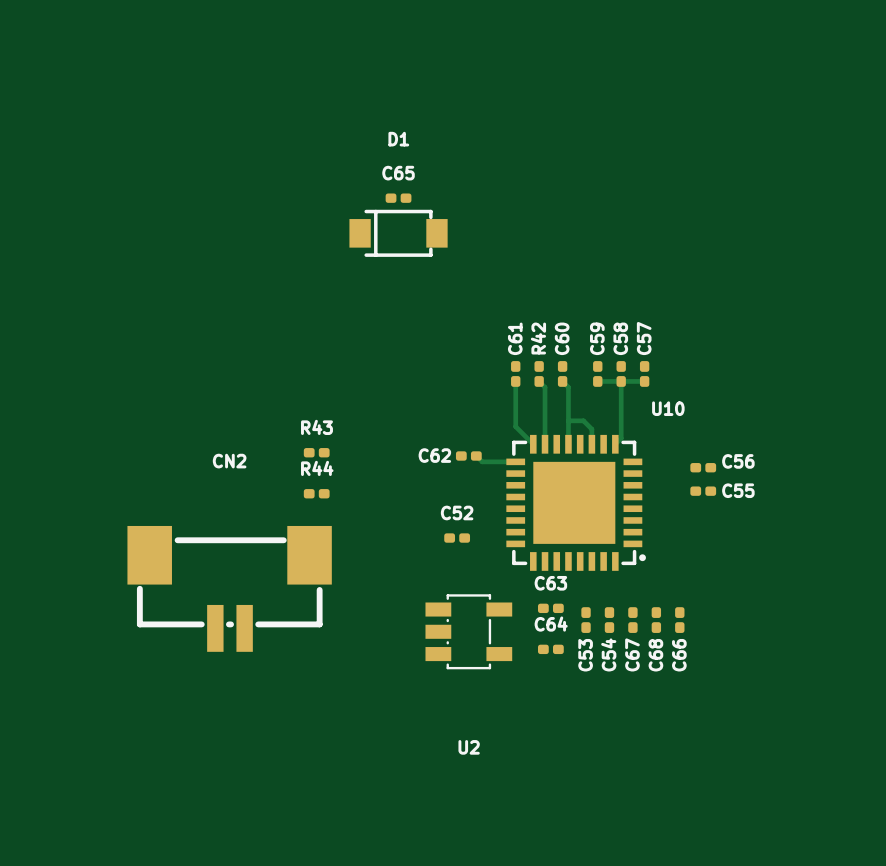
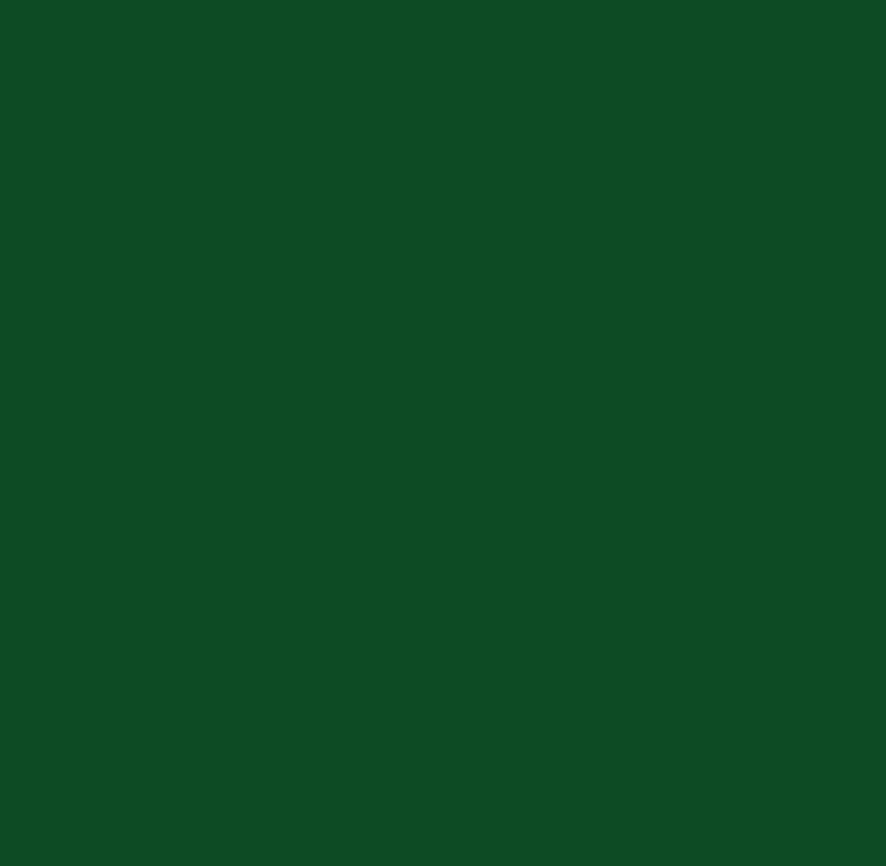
C65: (398, 198) -> none
D1: (398, 233) -> none
C61: (515, 373) -> none
R42: (539, 373) -> none
C60: (562, 373) -> none
C59: (597, 373) -> none
C58: (621, 373) -> none
C57: (644, 373) -> none
track: (515, 381) (515, 426) (533, 444) -> none
track: (539, 381) (545, 387) (545, 444) -> none
track: (562, 381) (568, 387) (568, 444) -> none
track: (597, 381) (644, 381) -> none
track: (621, 381) (621, 438) (615, 444) -> none
track: (568, 420) (583, 420) (591, 429) (591, 444) -> none
R43: (316, 452) -> none
C62: (468, 455) -> none
track: (476, 455) (482, 461) (515, 461) -> none
C56: (703, 467) -> none
C55: (703, 491) -> none
R44: (316, 493) -> none
U10: (576, 502) -> none
C52: (457, 538) -> none
CN2: (229, 588) -> none
C63: (550, 608) -> none
C53: (586, 620) -> none
C54: (609, 620) -> none
C67: (632, 620) -> none
C68: (656, 620) -> none
C66: (679, 620) -> none
U2: (468, 631) -> none
C64: (550, 649) -> none

